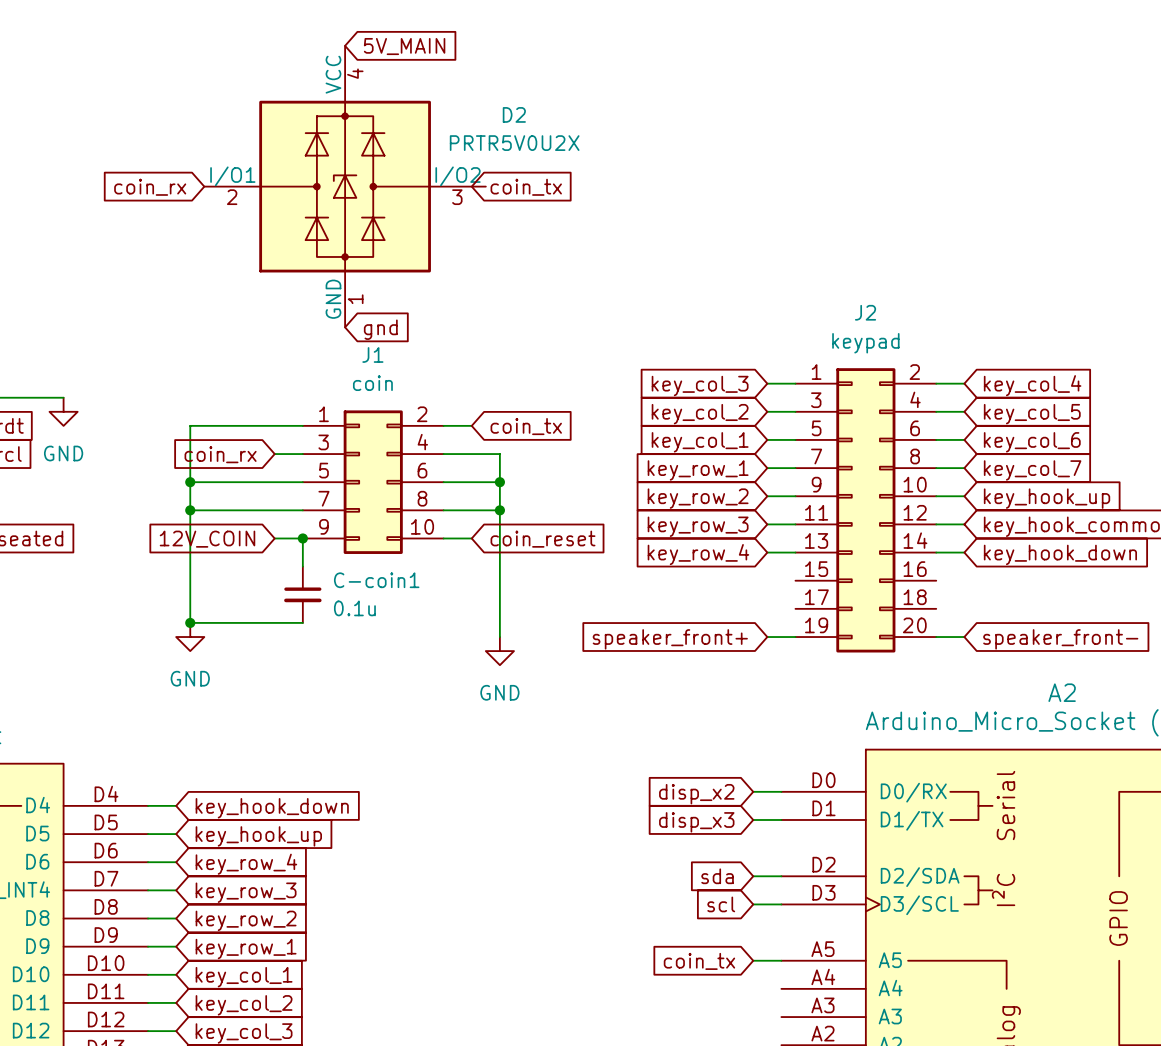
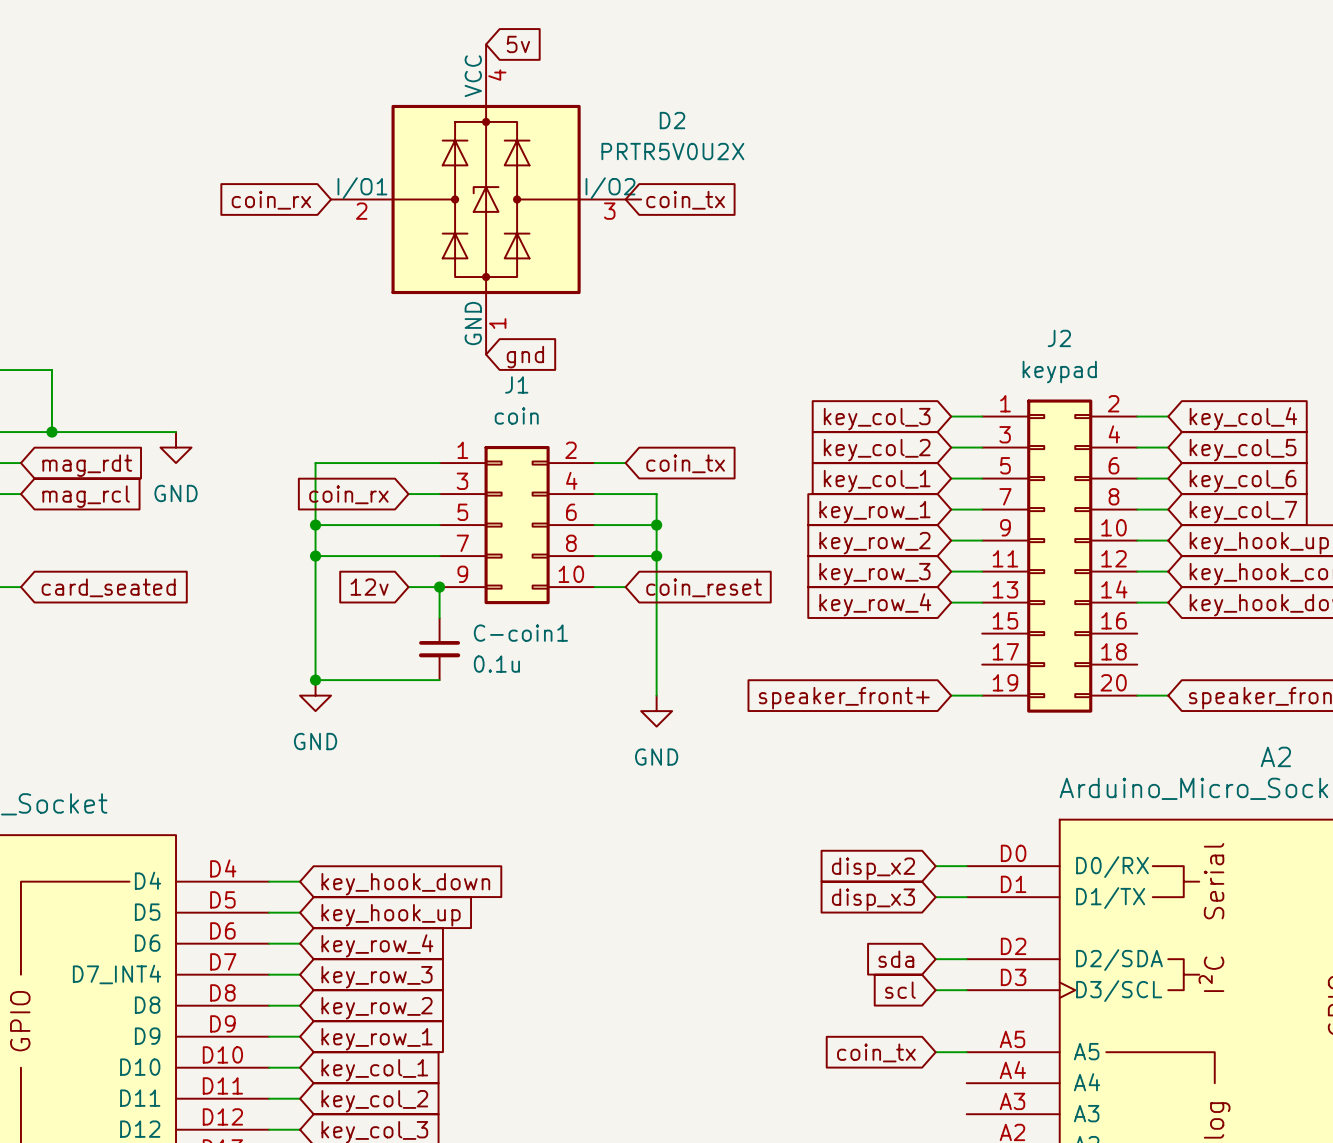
global label: 5V_MAIN (404, 46) -> 5v (518, 44)
global label: 12V_COIN (207, 539) -> 12v (369, 587)

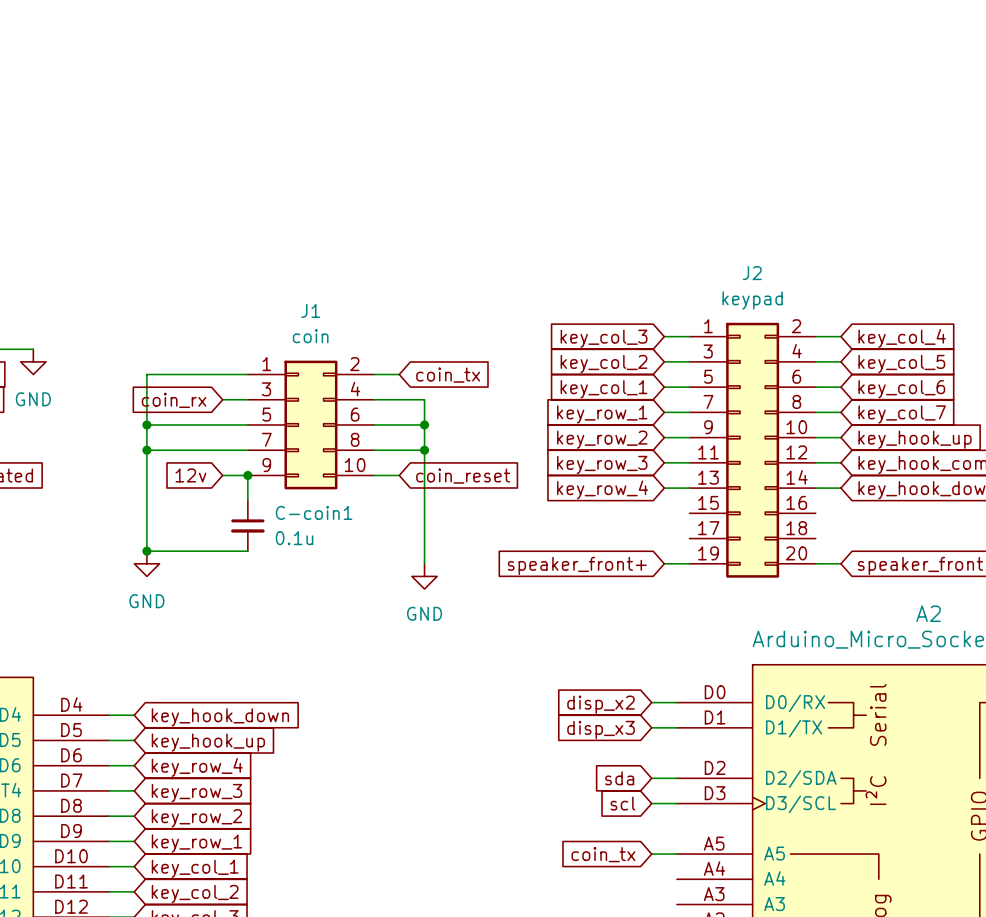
global label: 5v (518, 44) -> none
D2: PRTR5V0U2X (486, 199) -> none
global label: coin_rx (271, 200) -> none
global label: coin_tx (685, 200) -> none
global label: gnd (525, 357) -> none

